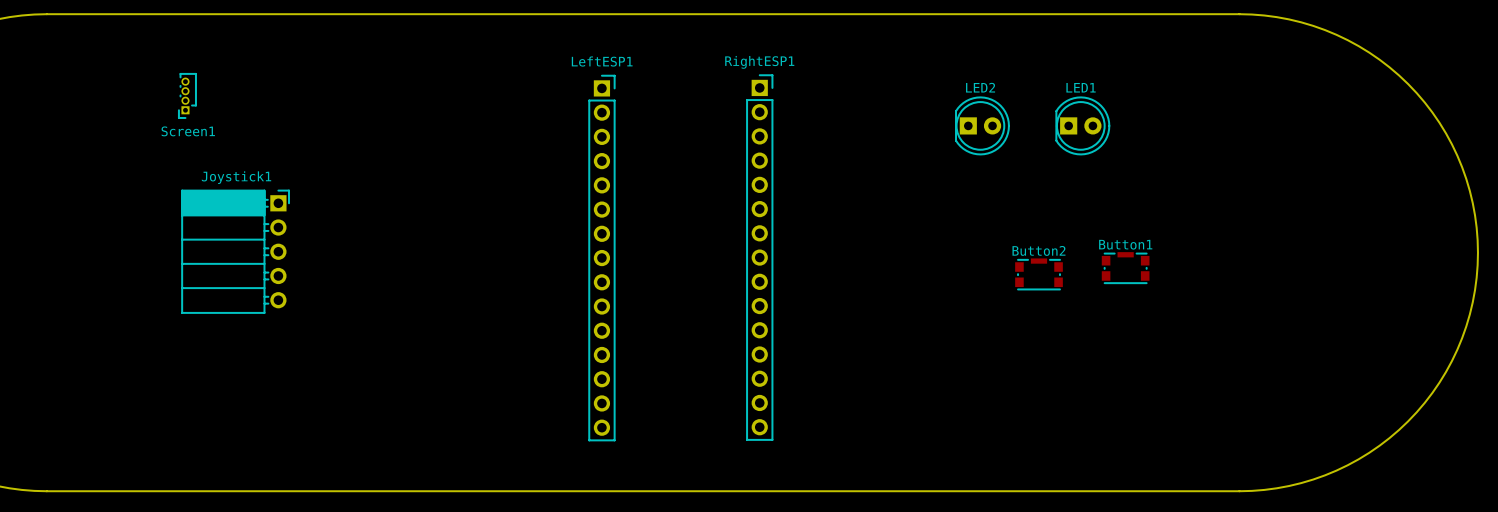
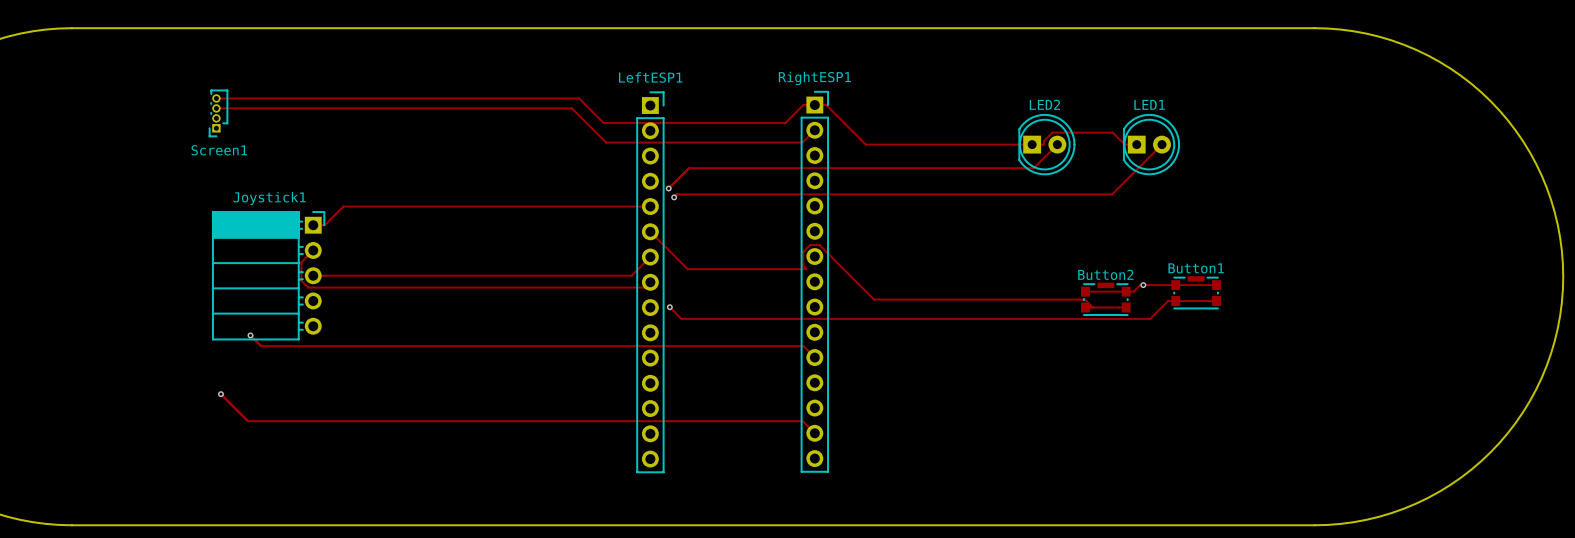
track: none -> (216, 98) (579, 98) (603, 122) (785, 122) (803, 105) (826, 105) (865, 144) (1044, 144) (1044, 140) (1052, 132) (1112, 132) (1124, 144) (1136, 144)
track: none -> (216, 108) (571, 108) (606, 142) (802, 142) (814, 130)
track: none -> (1057, 144) (1033, 168) (689, 168) (668, 188)
track: none -> (1161, 144) (1112, 194) (677, 194) (674, 197)
via: none -> (668, 188)
via: none -> (674, 197)
track: none -> (650, 206) (343, 206) (324, 225) (313, 225)
track: none -> (650, 231) (687, 269) (805, 269) (803, 265) (803, 251) (810, 245) (819, 245) (874, 299) (1084, 299) (1092, 307)
track: none -> (313, 250) (301, 262) (301, 280) (308, 287) (645, 287) (650, 282)
track: none -> (650, 257) (631, 275) (313, 275)
via: none -> (1143, 285)
track: none -> (1216, 285) (1140, 285) (1133, 291) (1085, 291)
track: none -> (1216, 300) (1168, 300) (1150, 318) (681, 318) (669, 307)
via: none -> (669, 307)
track: none -> (1085, 307) (1126, 307)
track: none -> (250, 335) (261, 346) (803, 346) (814, 357)
via: none -> (250, 335)
track: none -> (220, 394) (248, 421) (802, 421) (814, 433)
via: none -> (220, 394)

